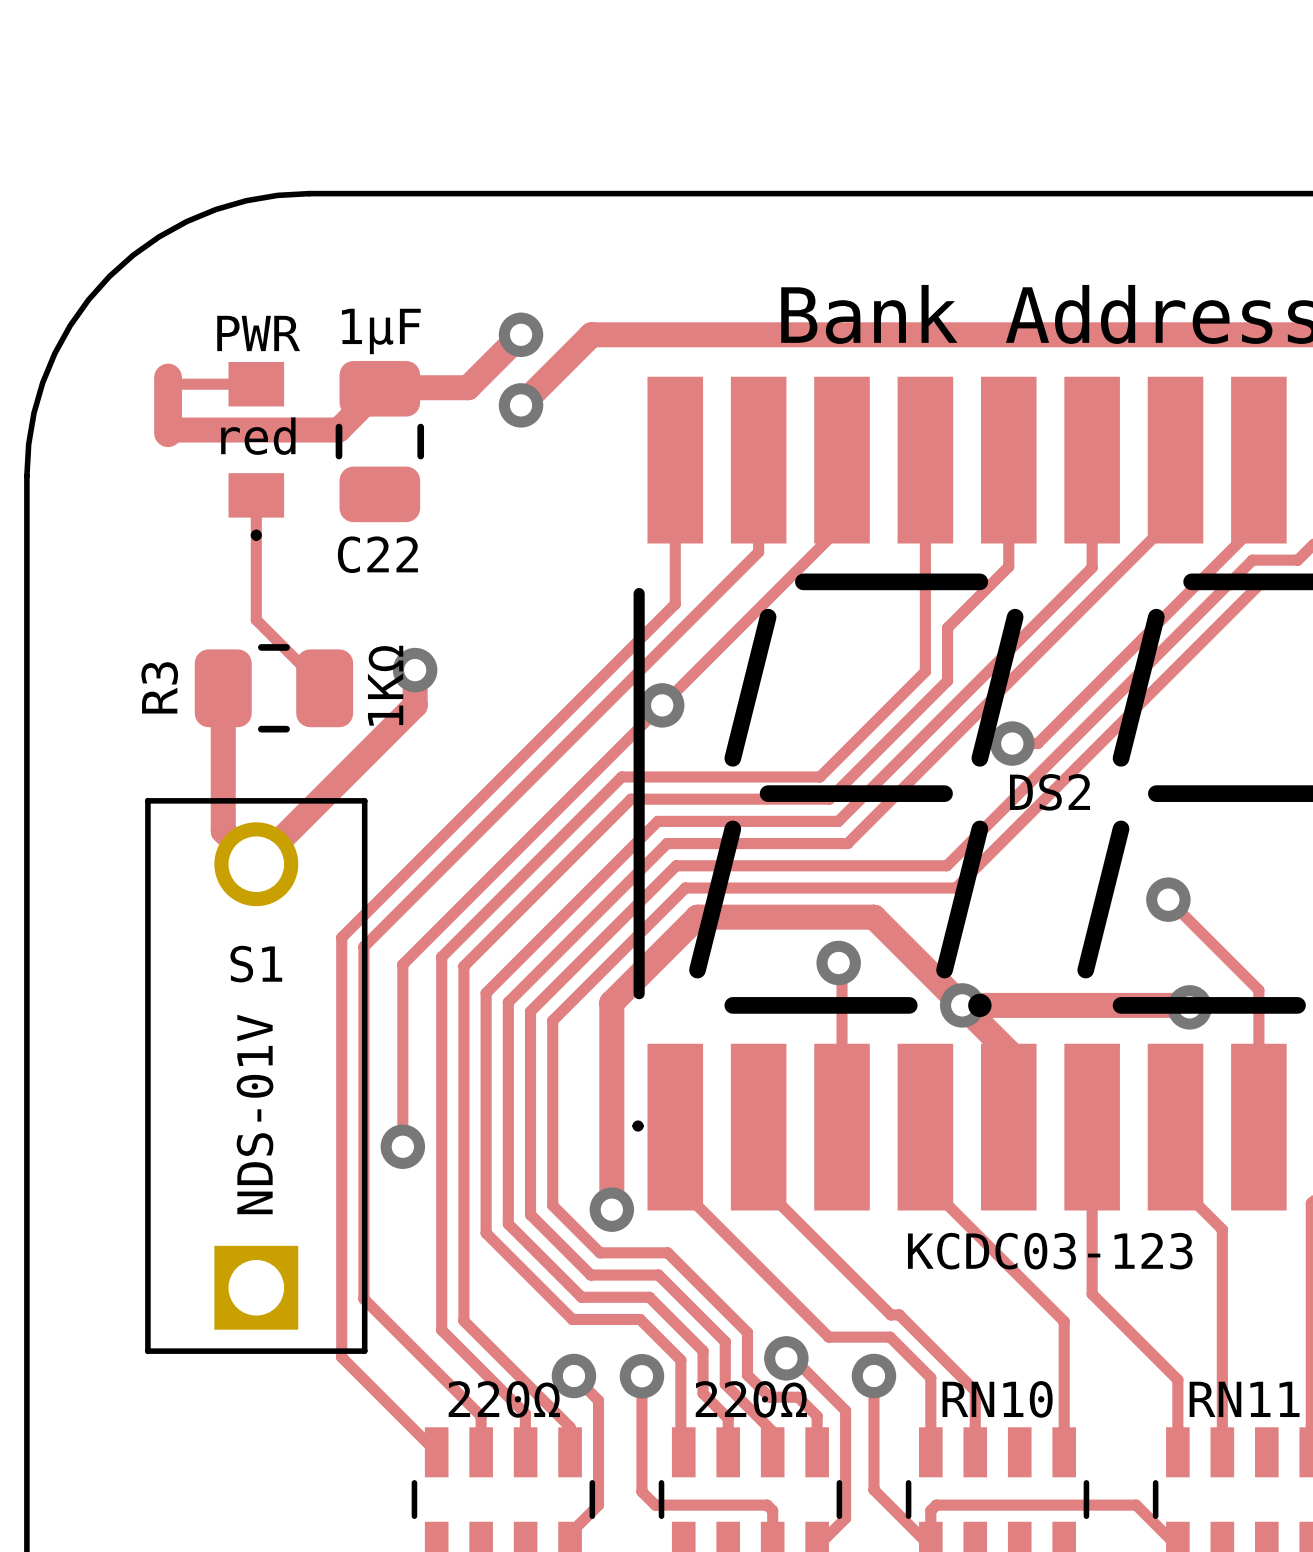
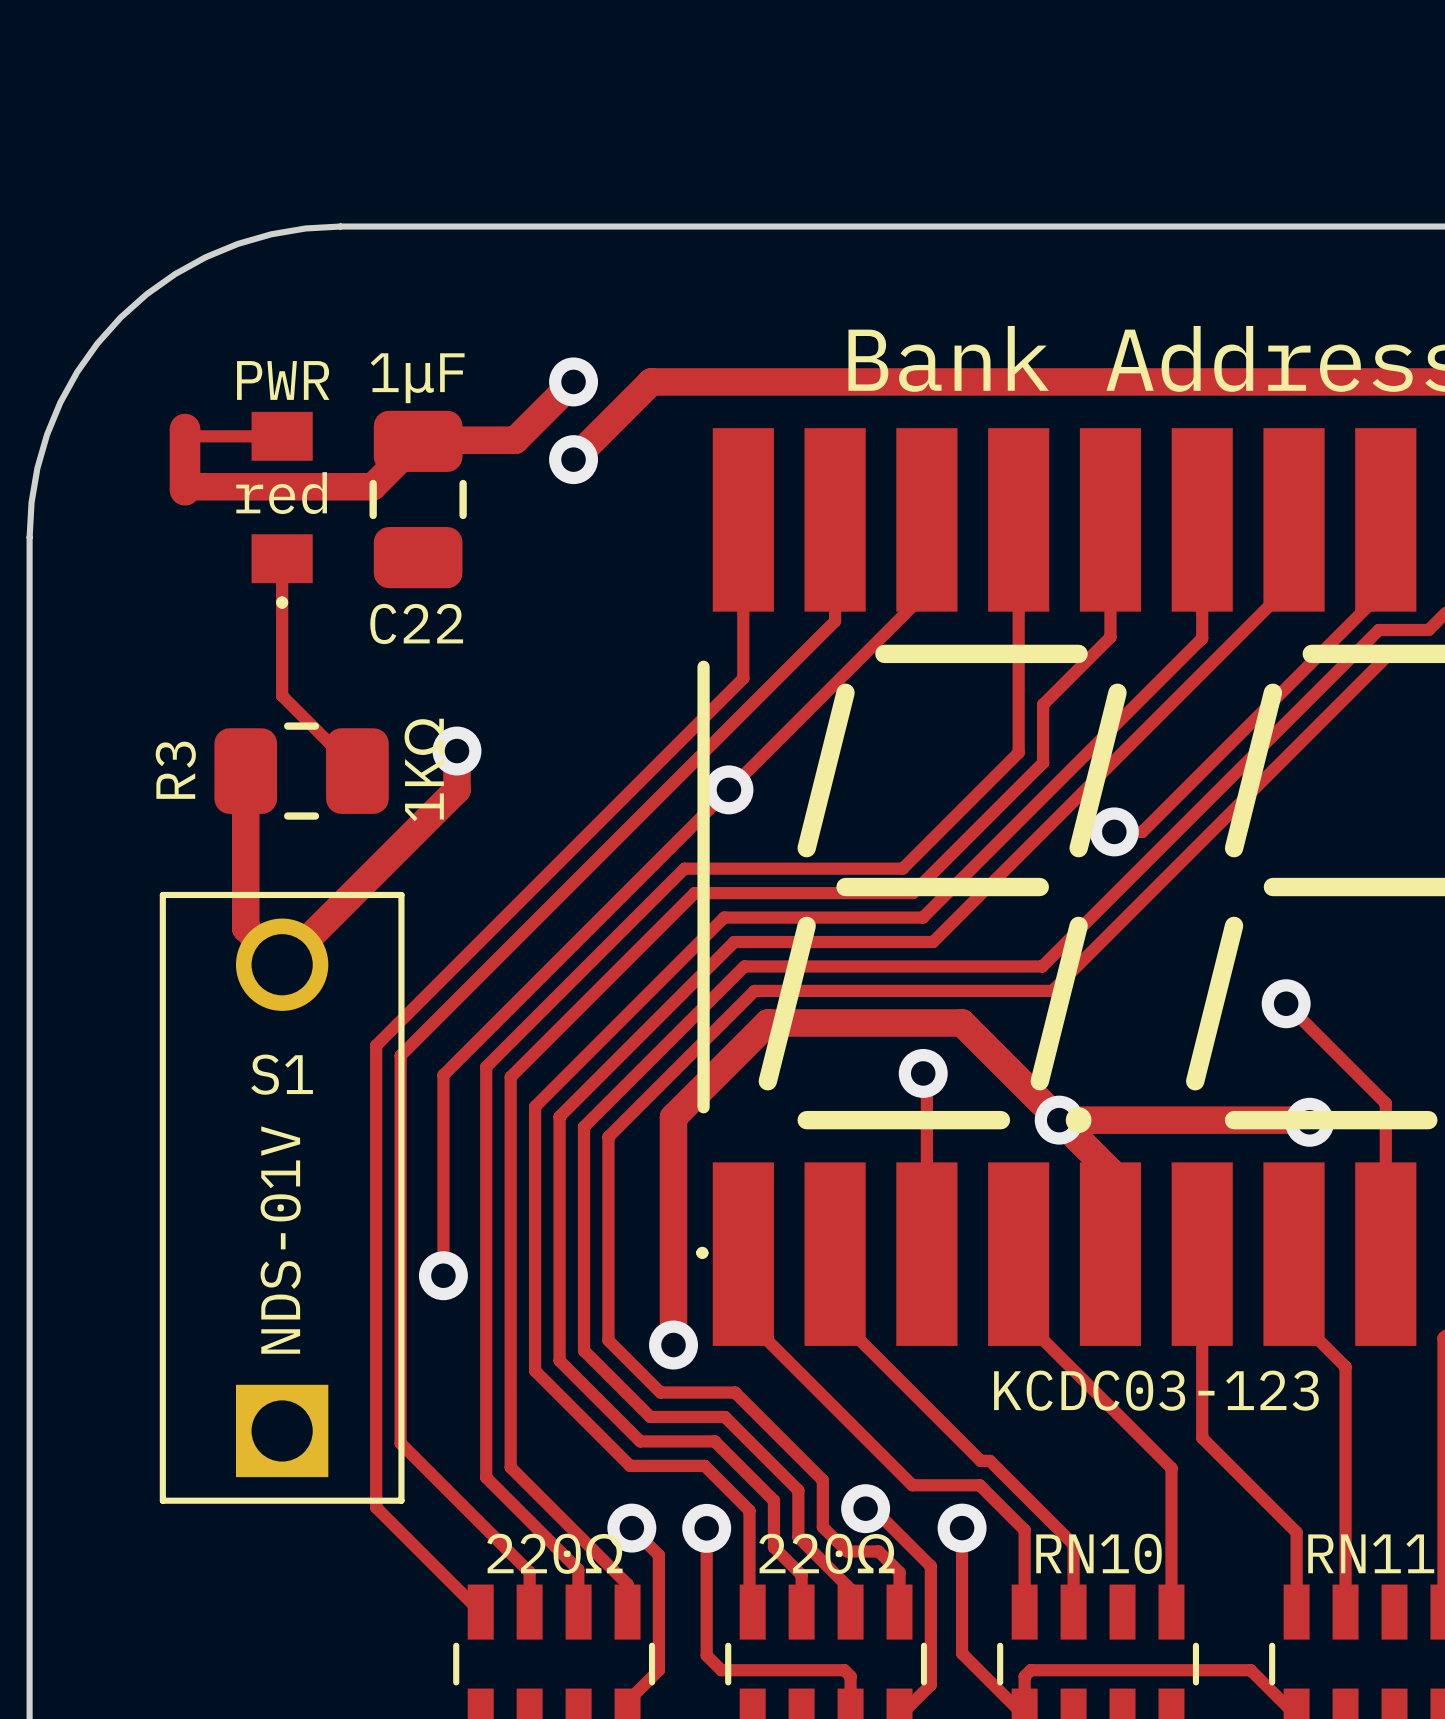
DS2 name: DS2 (1050, 792) -> none

